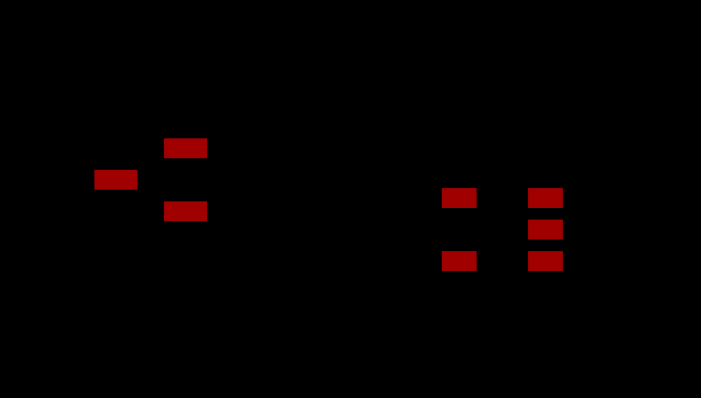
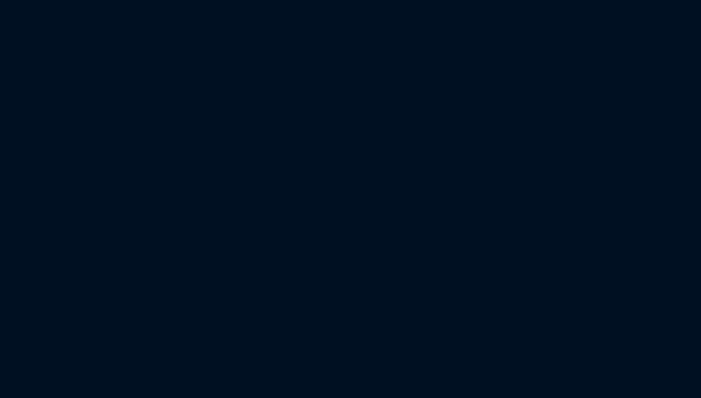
part: (150, 179) -> none
part: (502, 229) -> none

